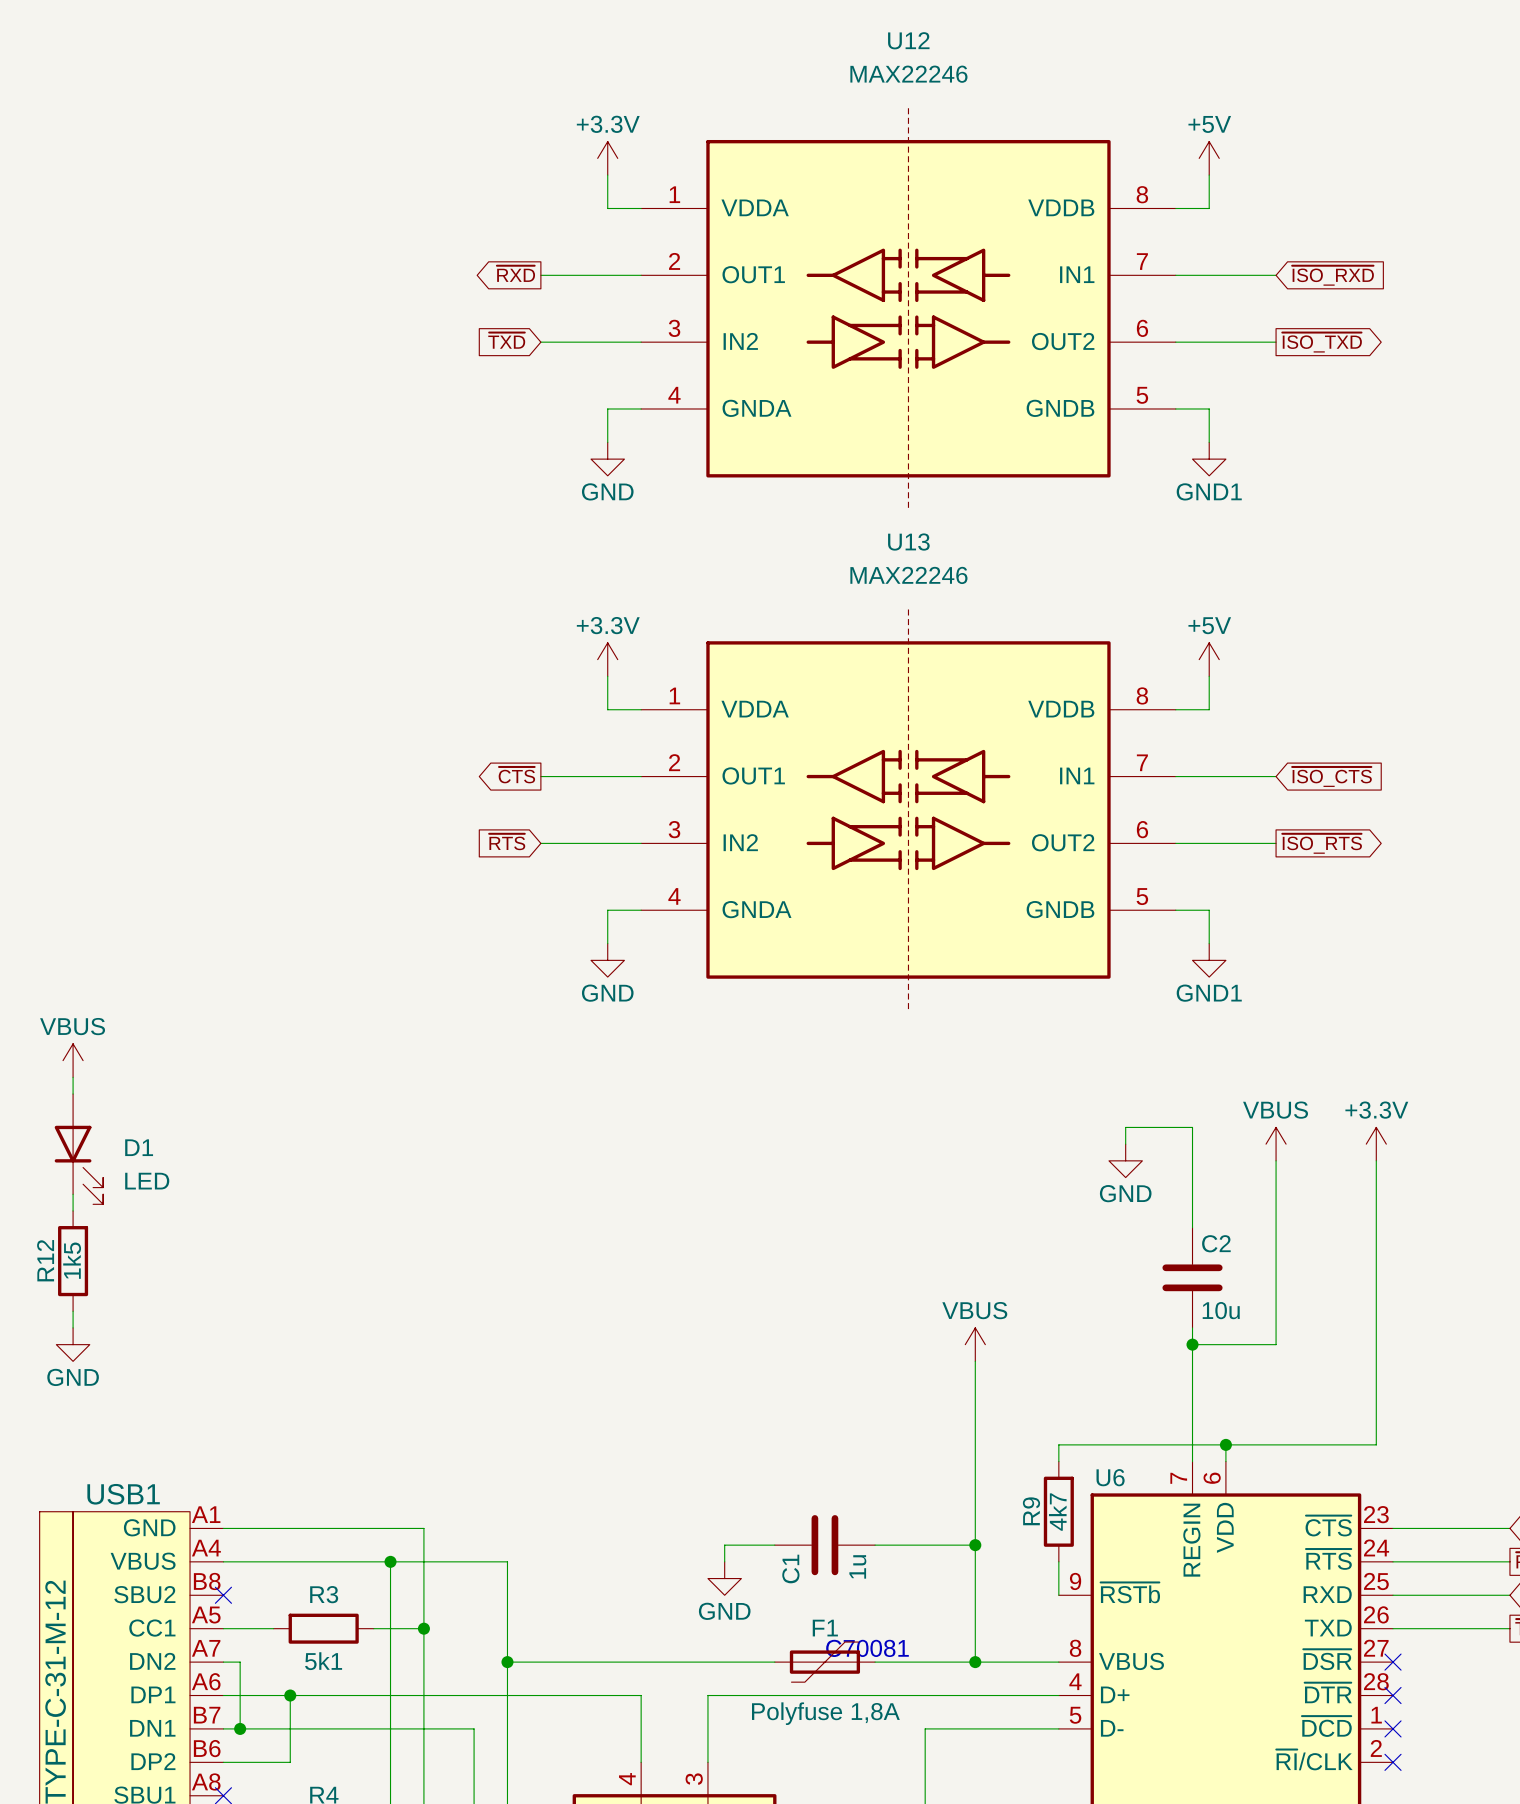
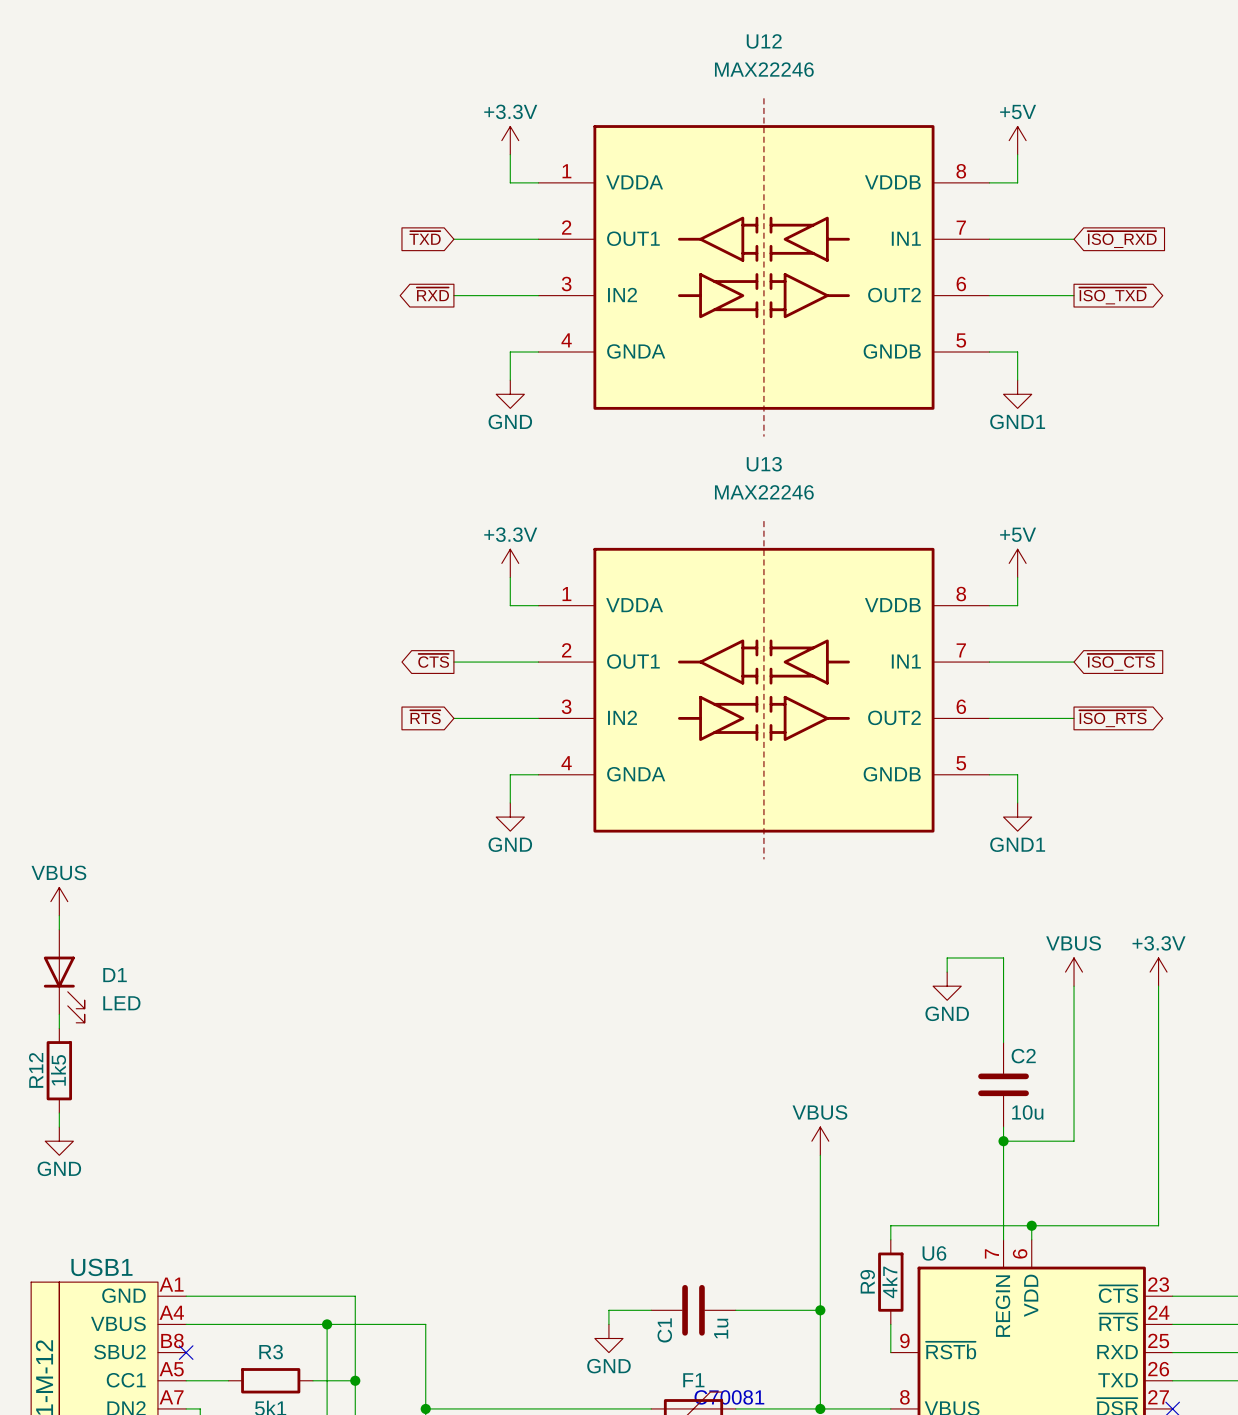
global label shape: output (515, 273) -> input (425, 237)
global label: ~{RXD} (515, 273) -> ~{TXD} (425, 237)
global label shape: input (506, 340) -> output (432, 294)
global label: ~{TXD} (506, 340) -> ~{RXD} (432, 294)

